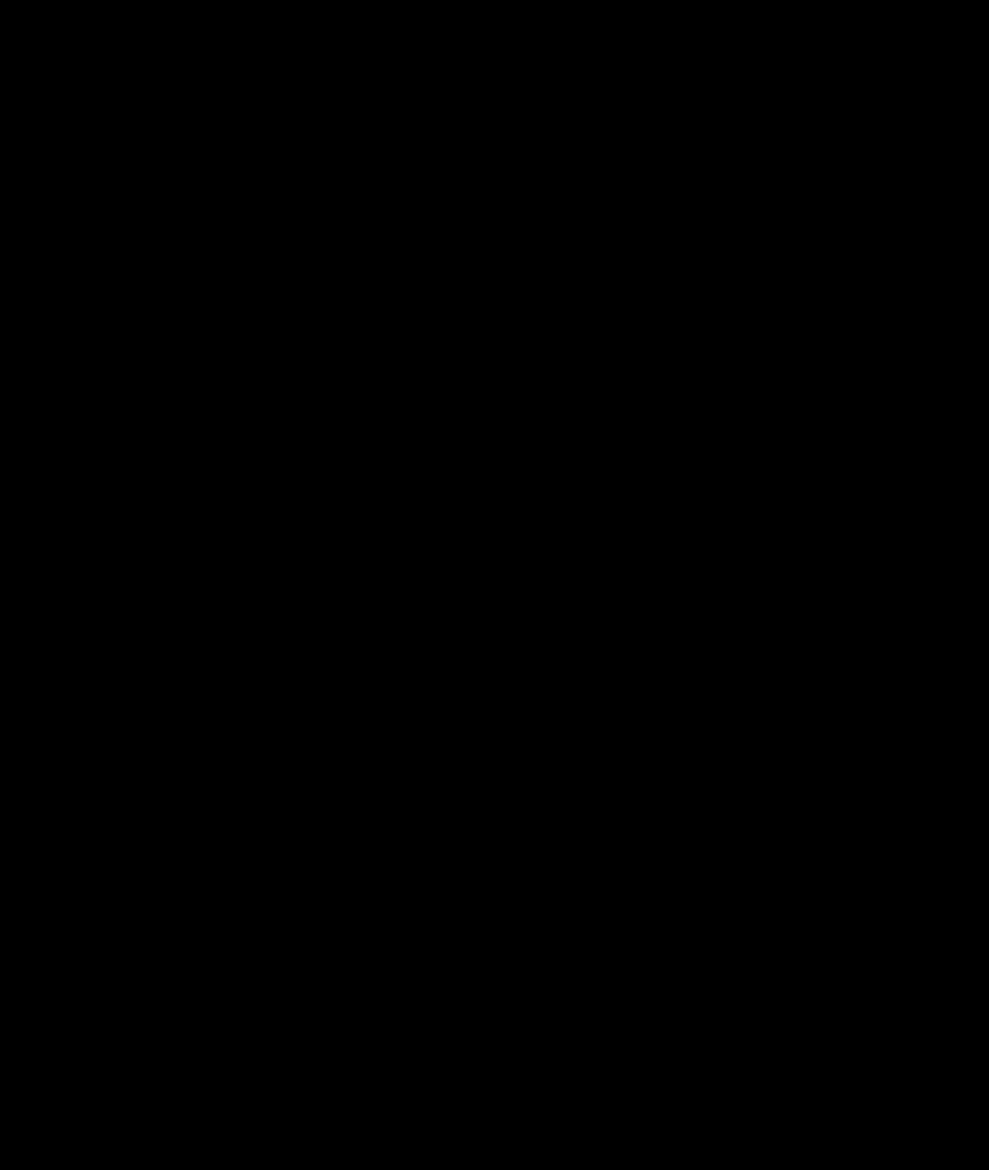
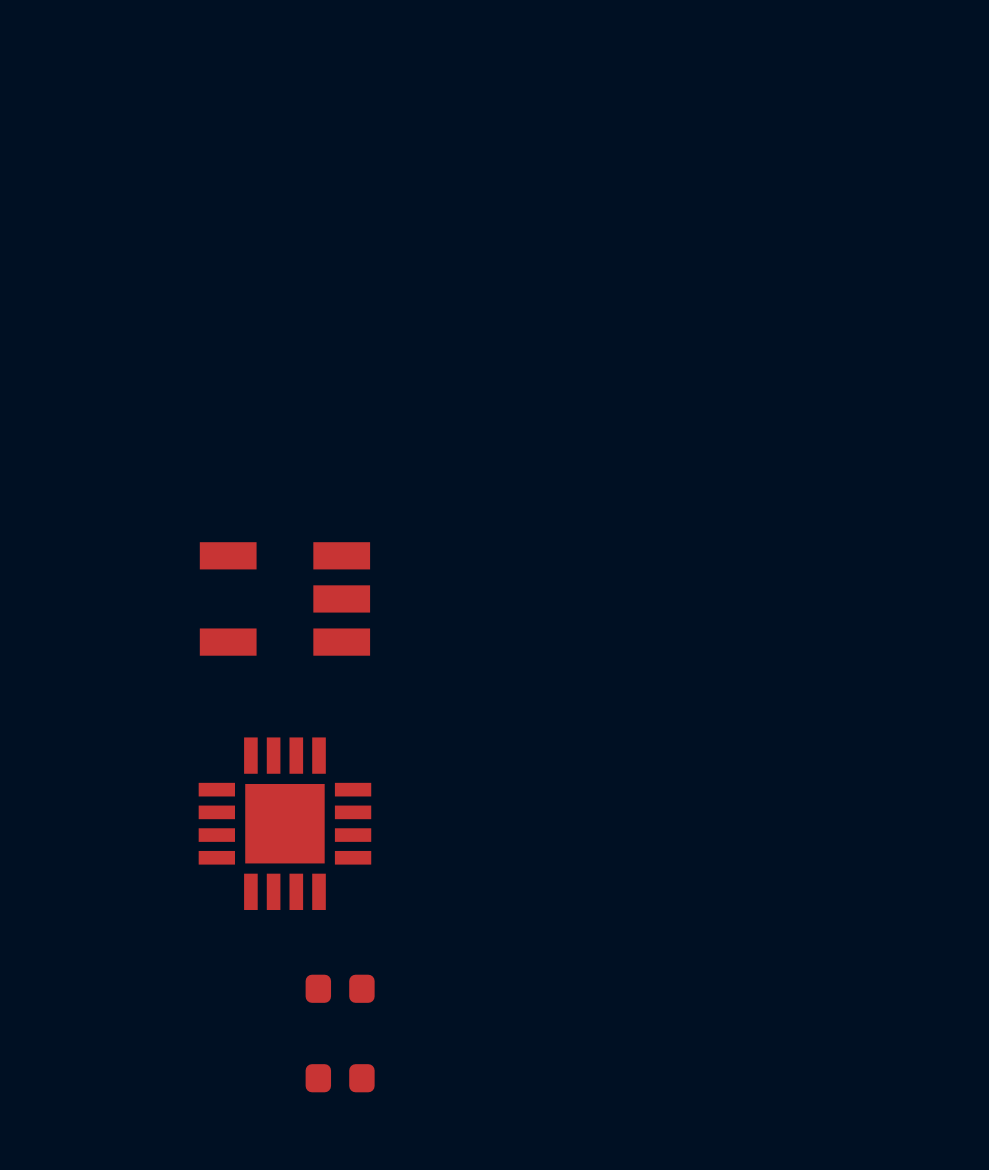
part: none -> (284, 598)
part: none -> (284, 823)
part: none -> (340, 988)
part: none -> (340, 1078)

